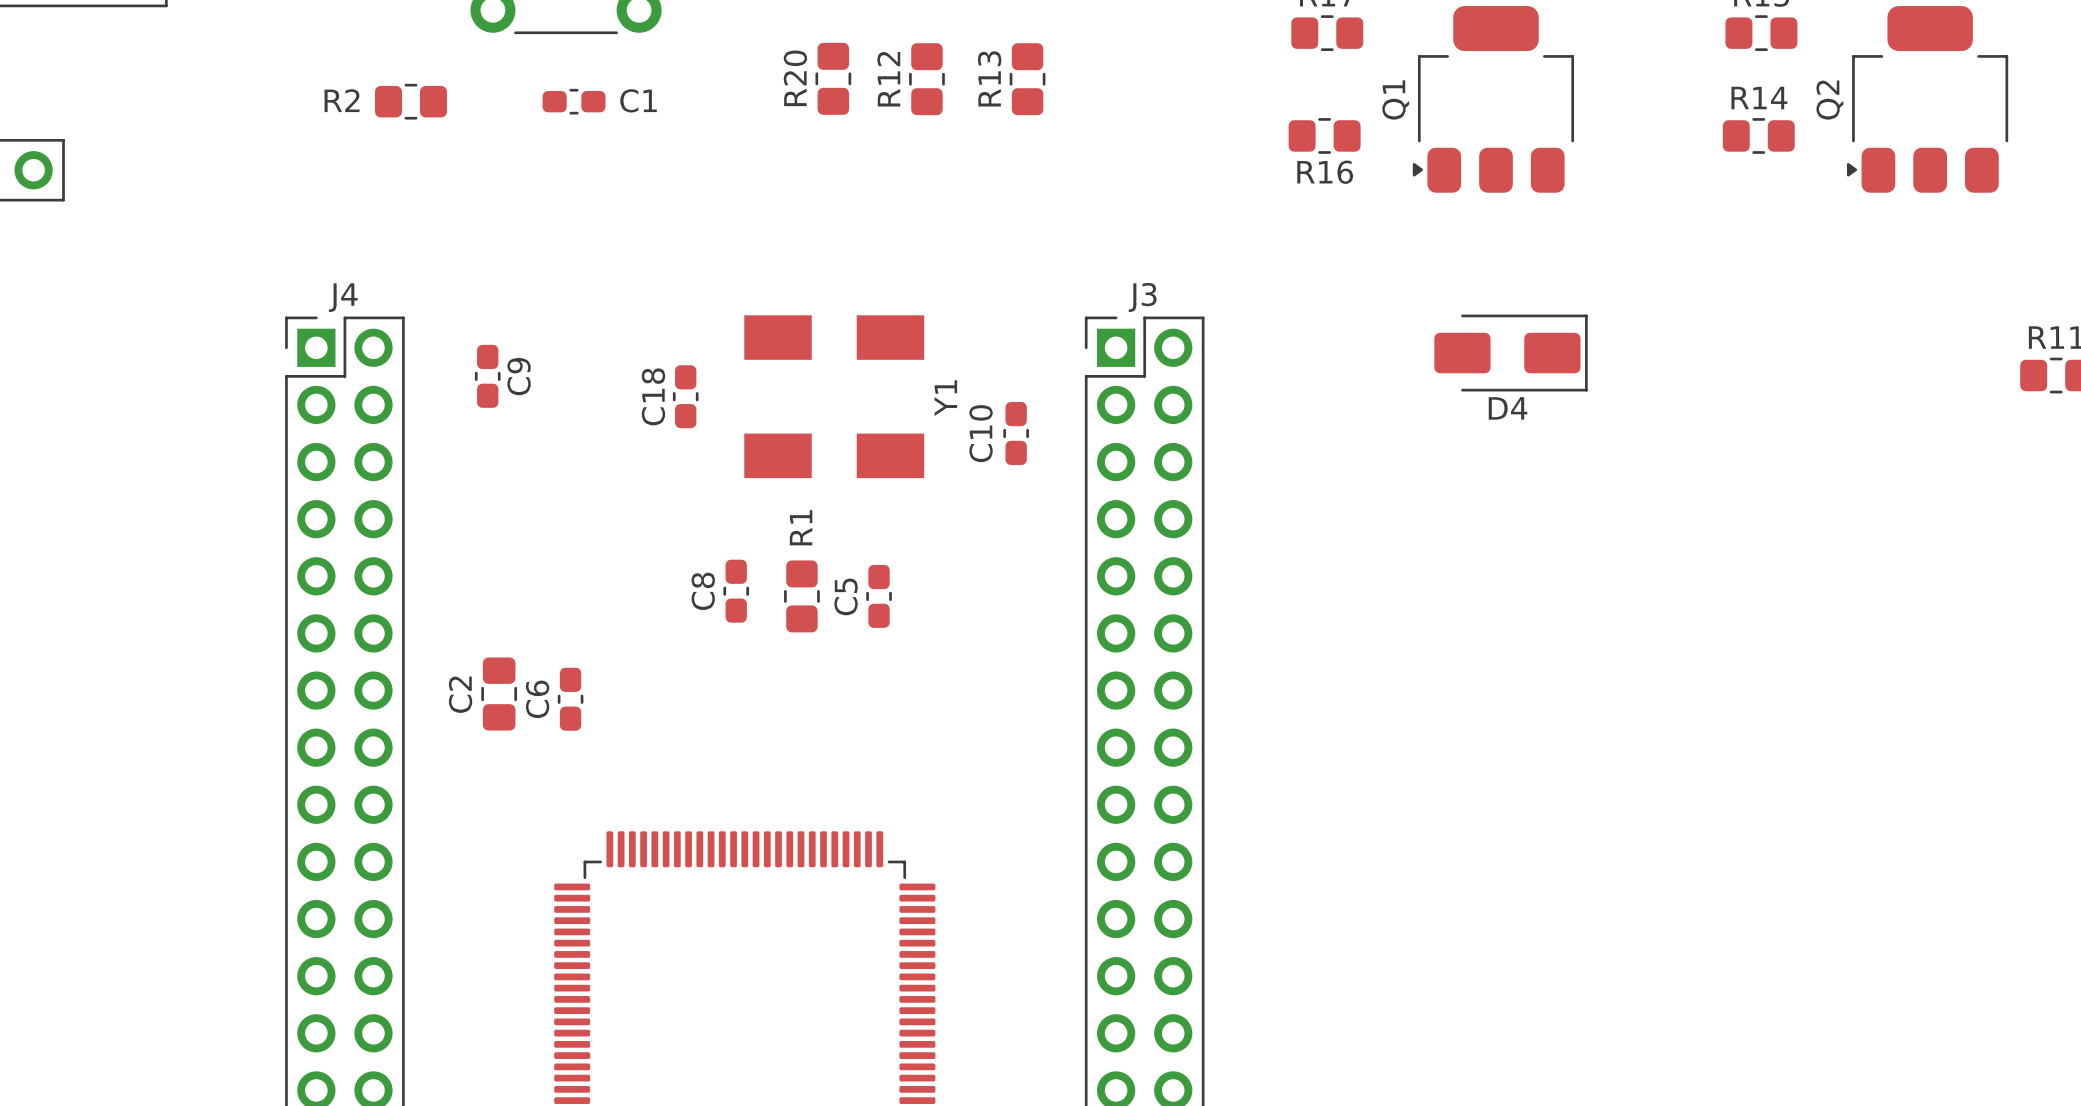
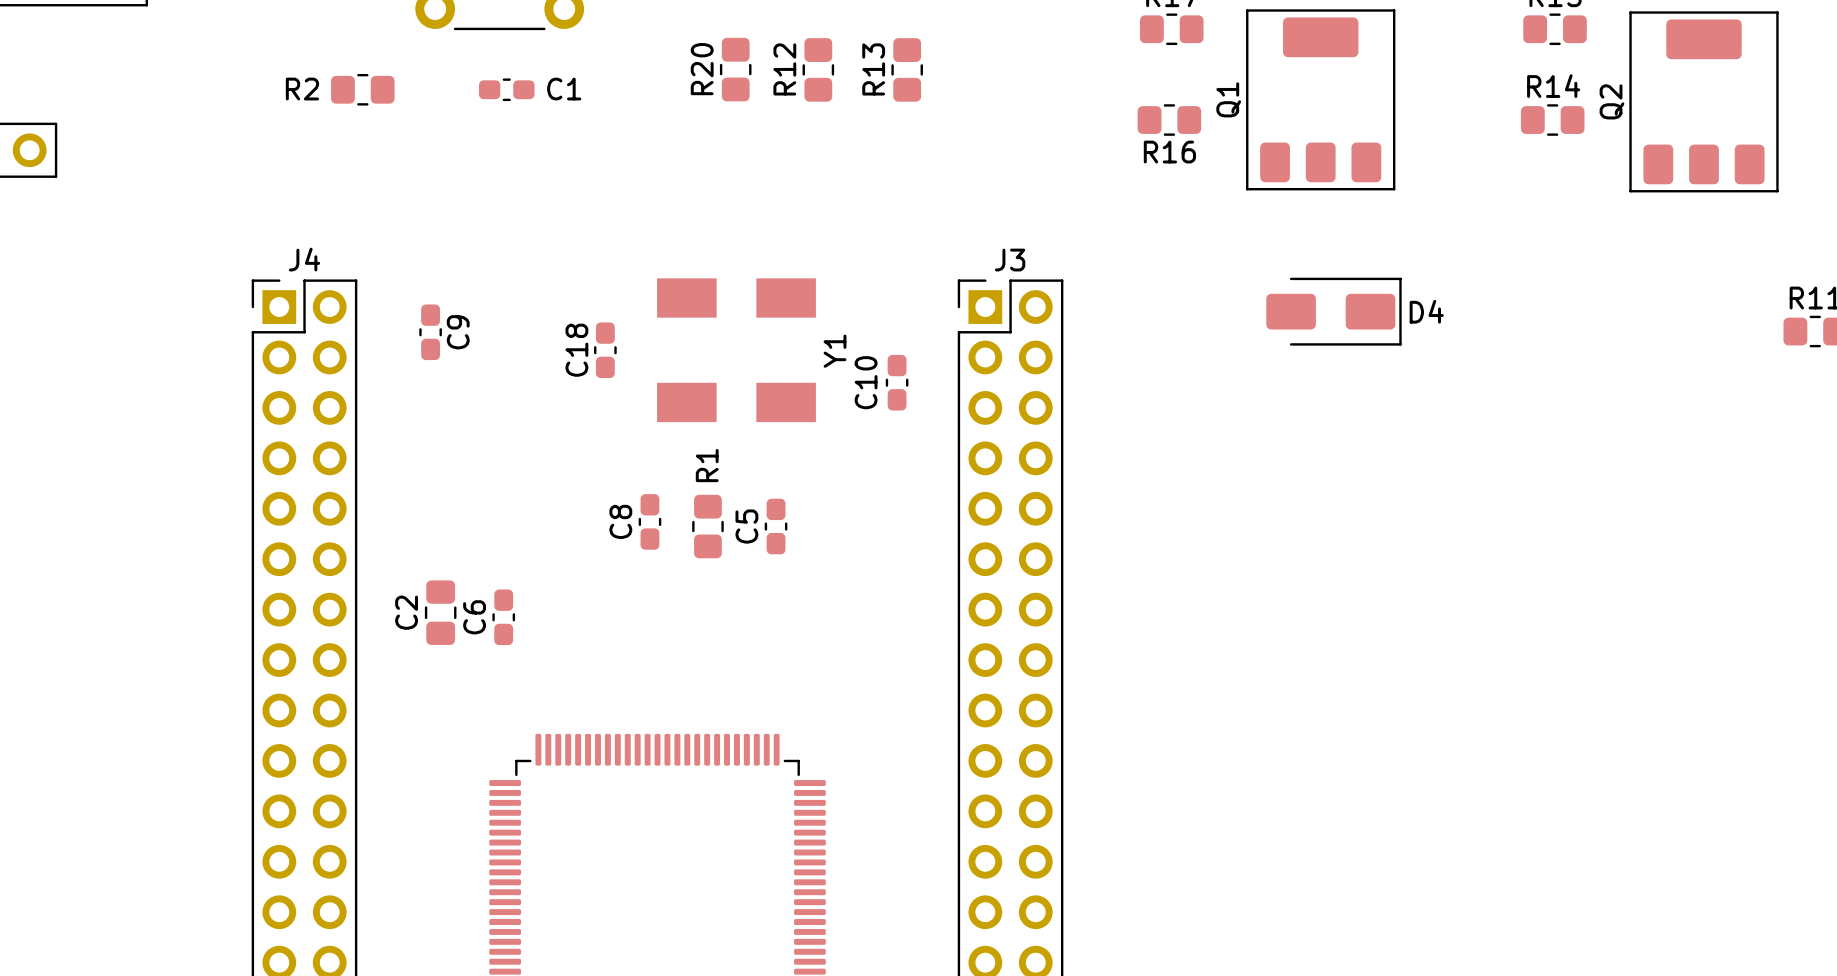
Q1 footprint: [1412, 6, 1575, 193] -> [1246, 9, 1396, 191]
Q2 footprint: [1846, 6, 2009, 193] -> [1629, 11, 1779, 193]
D4 name position: D4 (1508, 408) -> D4 (1426, 311)

